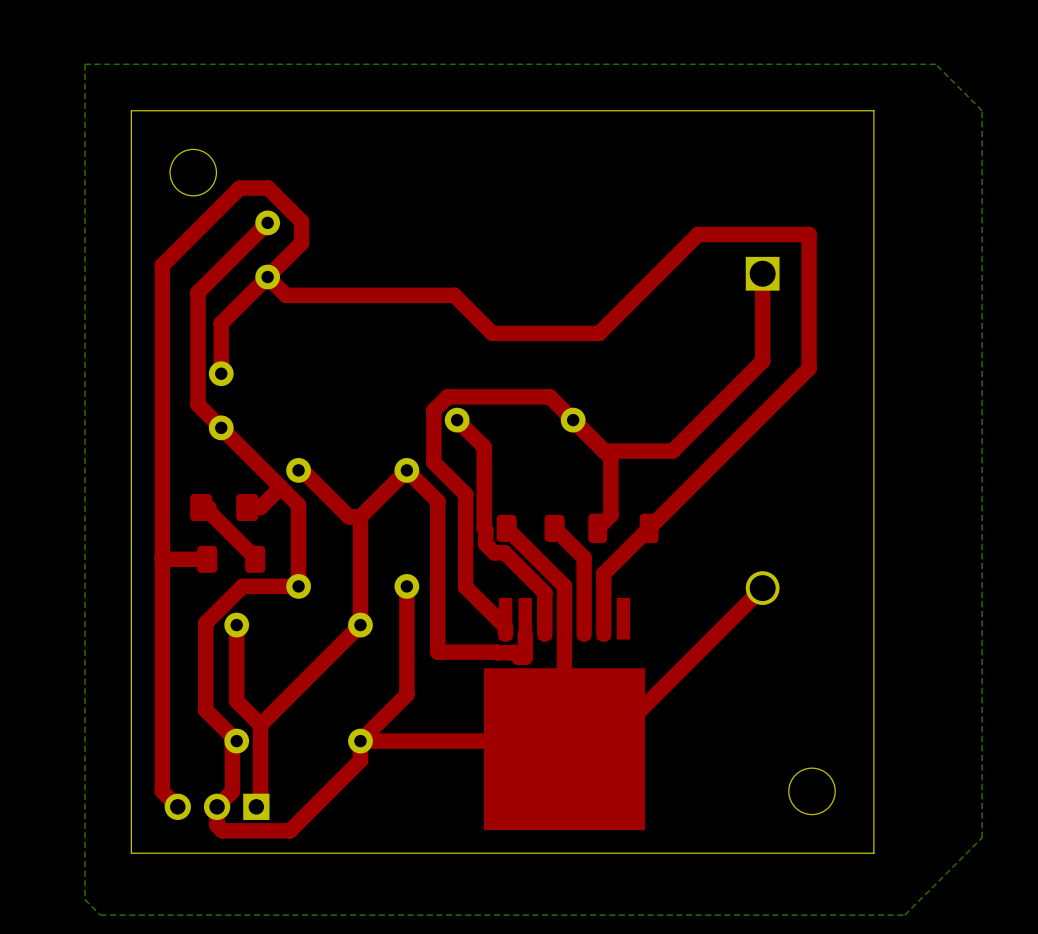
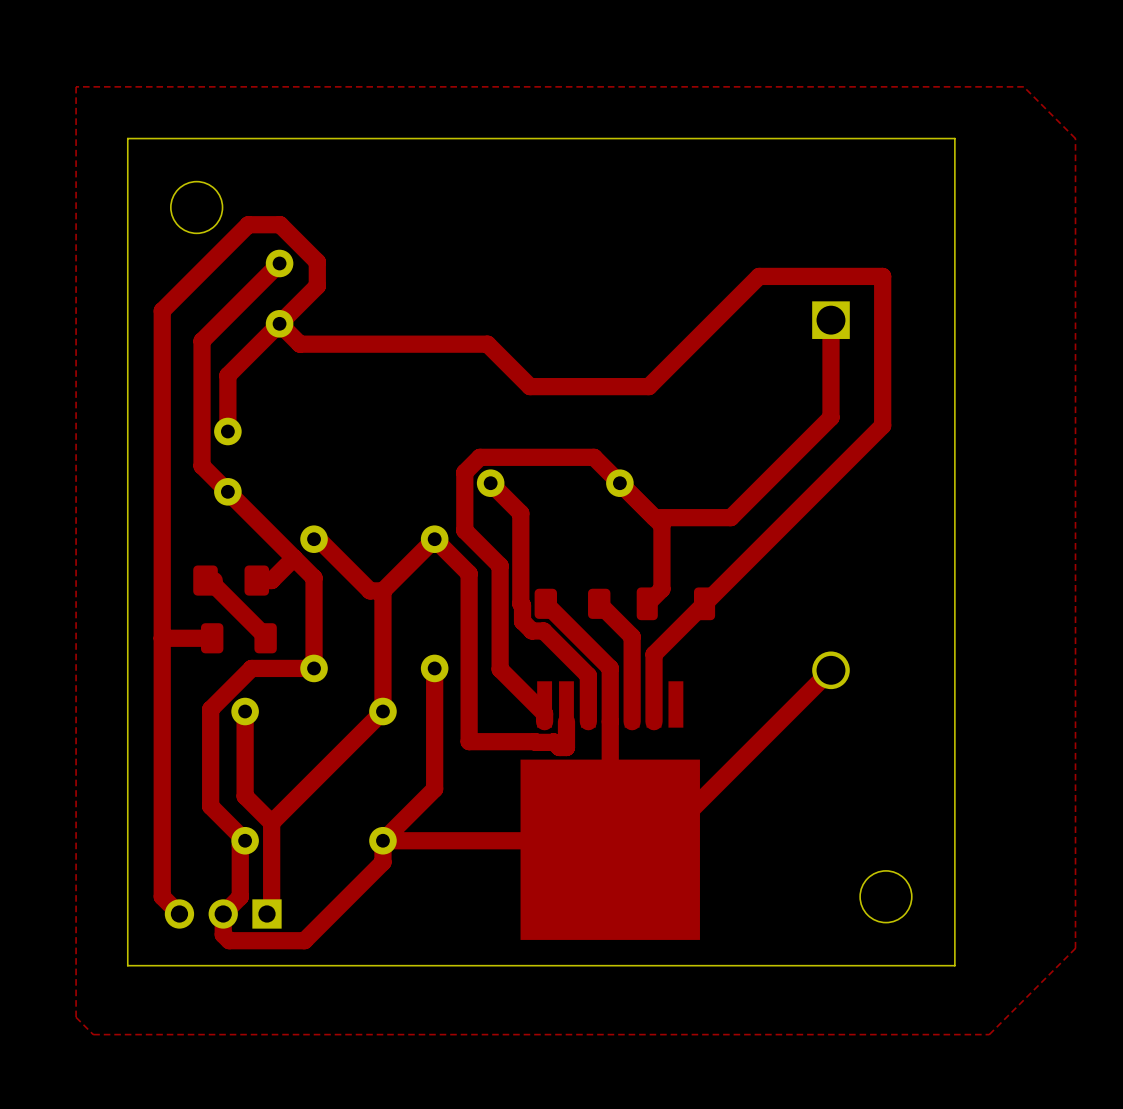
bottom zone outline: (935, 64) (84, 64) (84, 899) (100, 915) (904, 915) (982, 837) (982, 110) (935, 64) -> none

